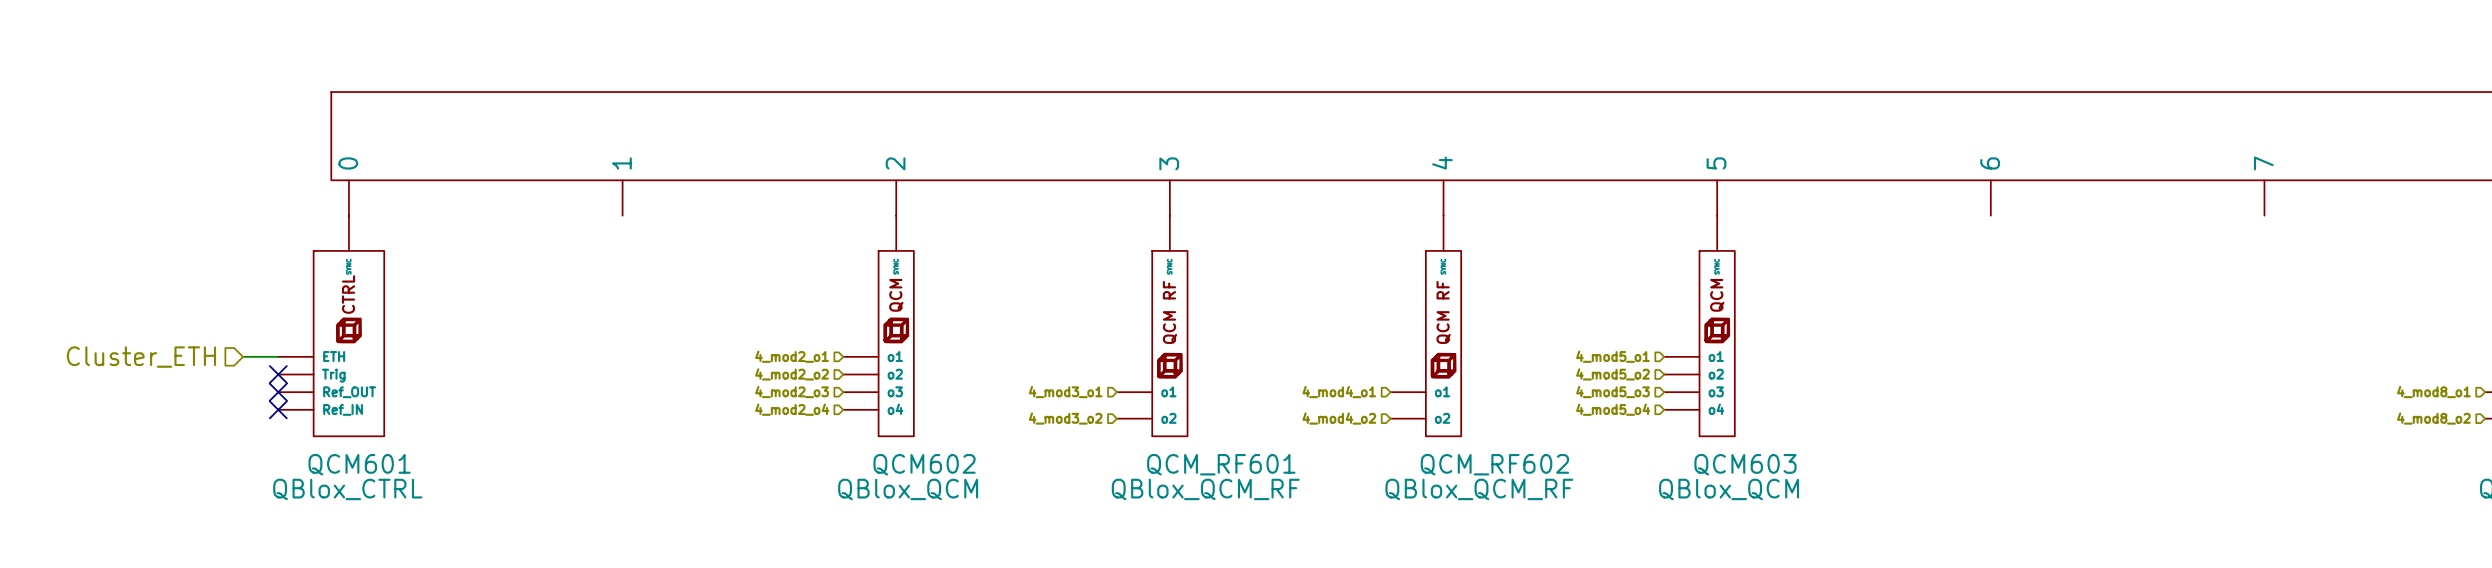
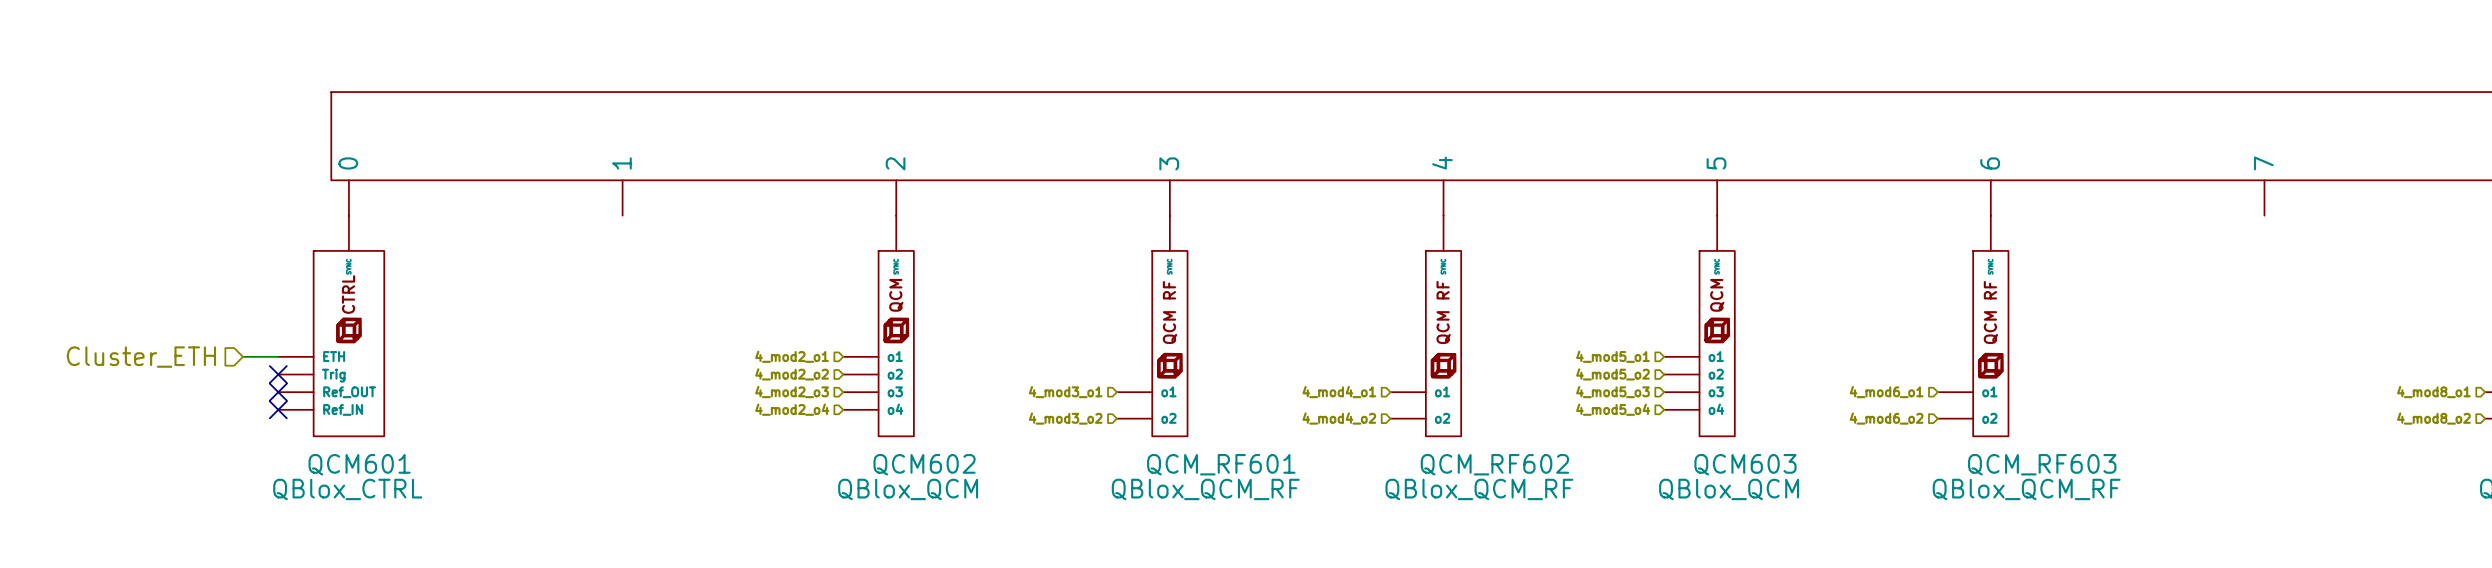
QCM_RF603: none -> QBlox_QCM_RF (1973, 325)
hierarchical label: none -> 4_mod6_o1 (1886, 392)
hierarchical label: none -> 4_mod6_o2 (1886, 418)

